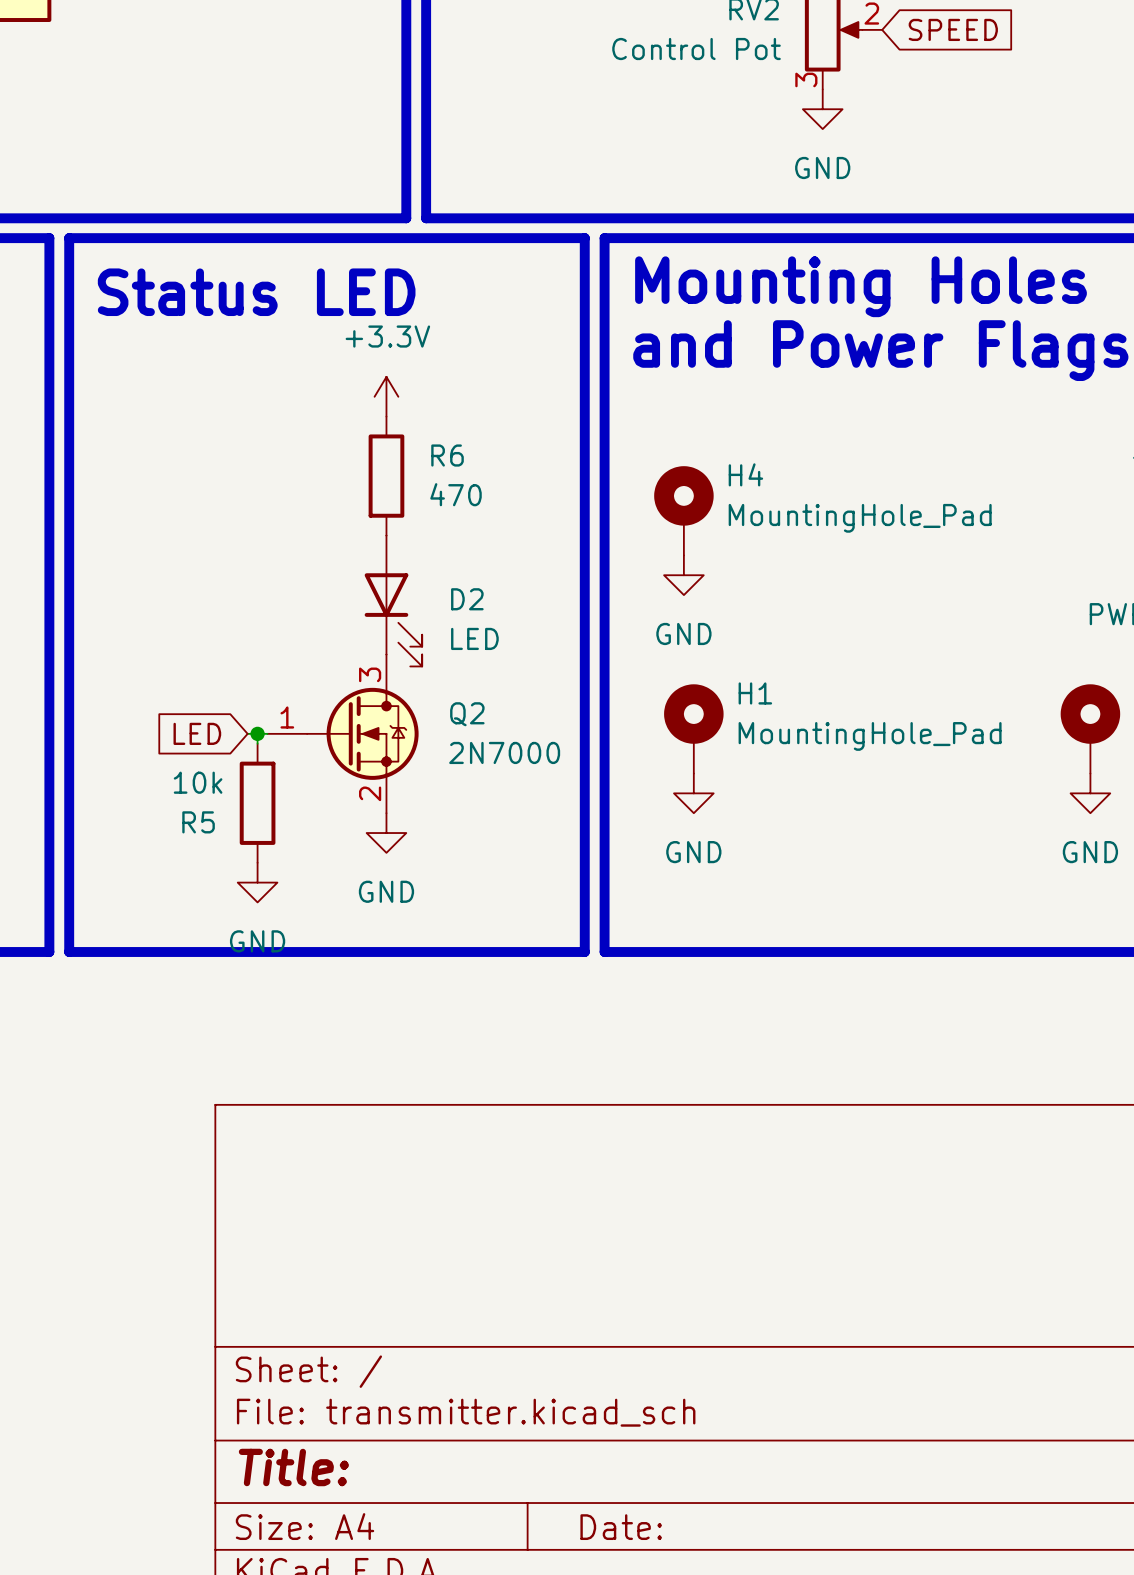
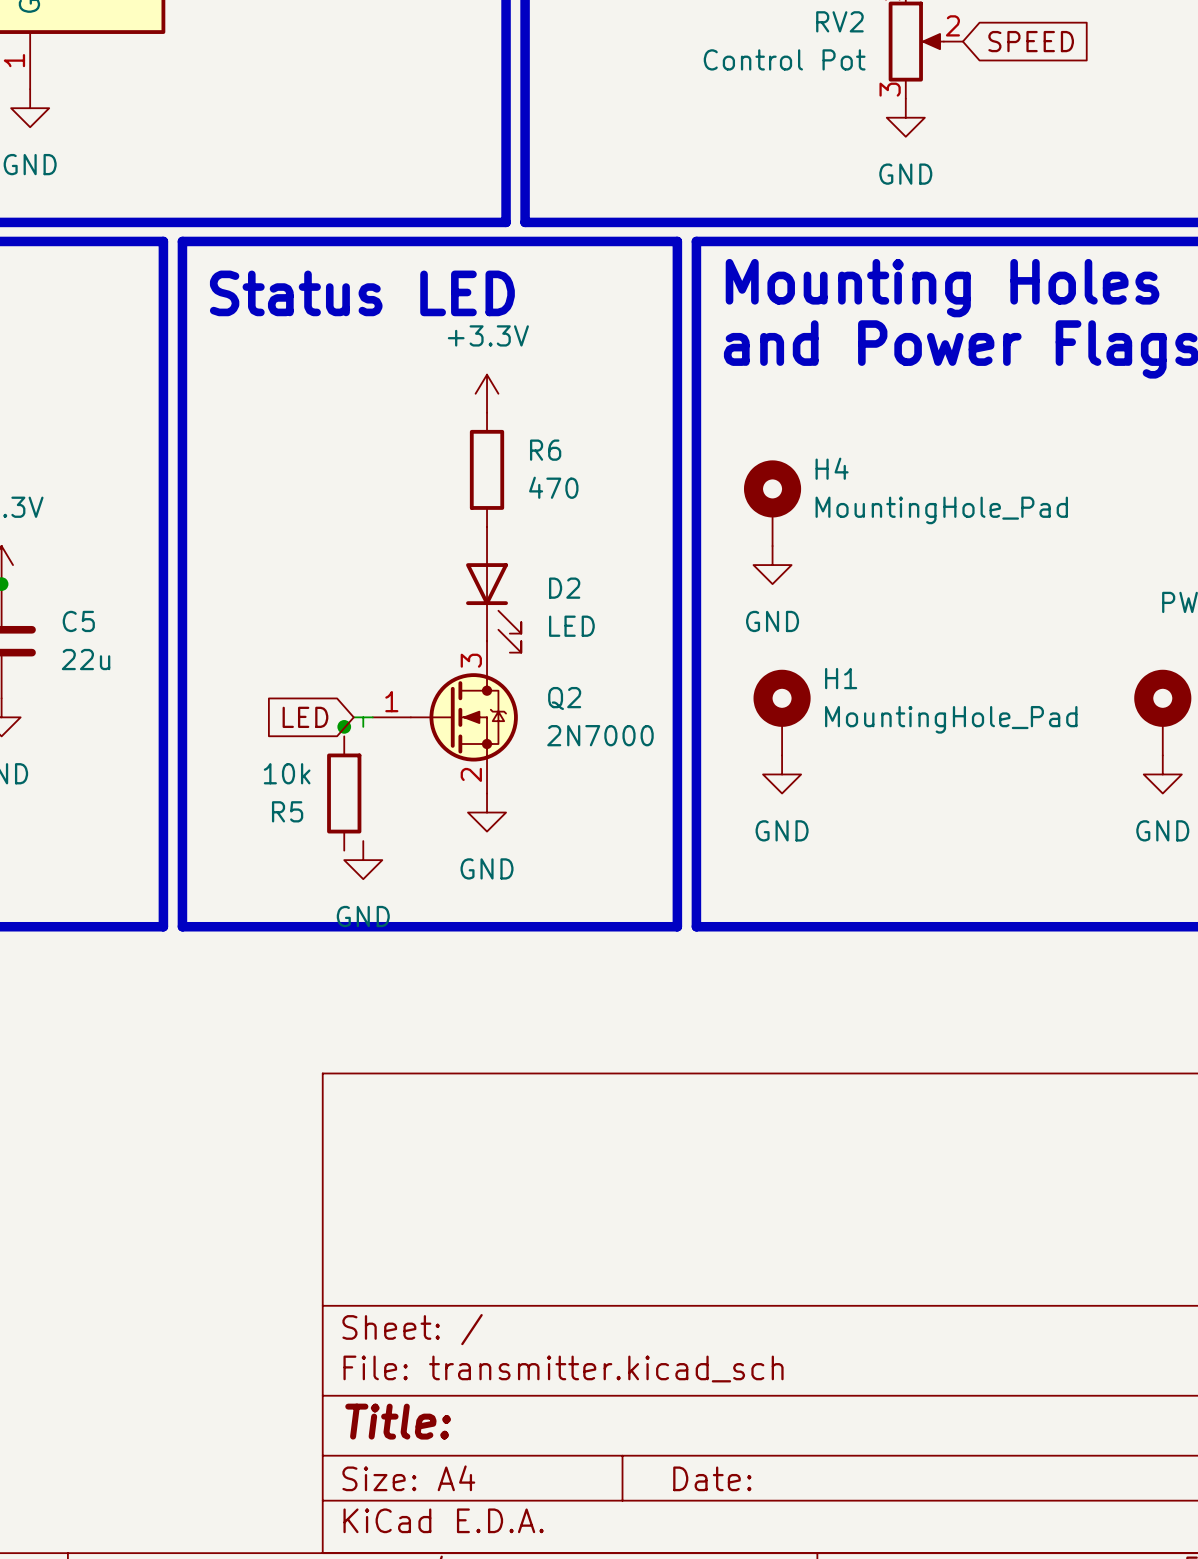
junction position: (257, 733) -> (344, 726)
R5 position: (257, 803) -> (344, 793)

